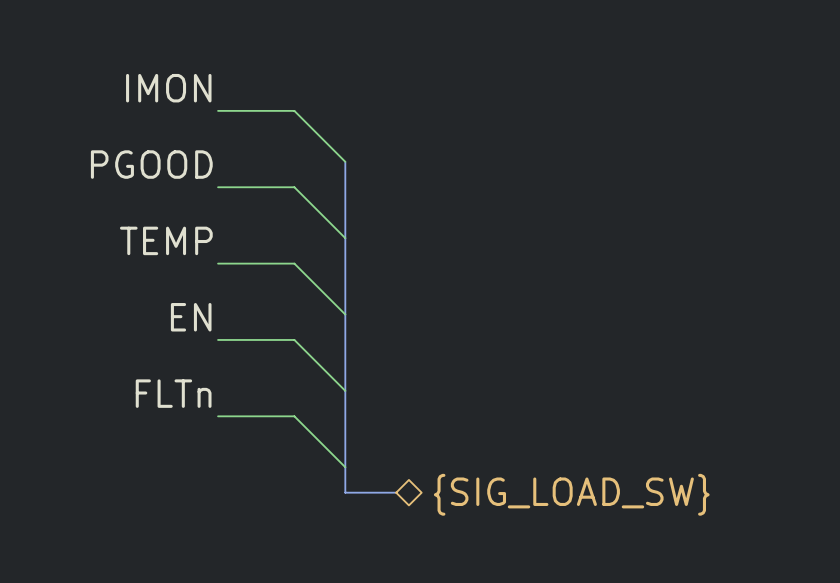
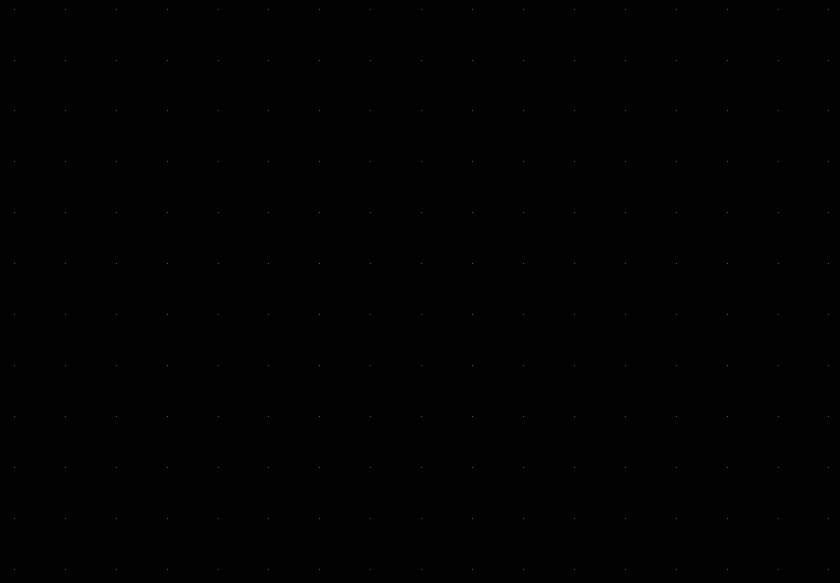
label: IMON (168, 88) -> none
wire: (218, 110) (294, 110) (345, 161) -> none
bus: (345, 161) (345, 492) (396, 492) -> none
label: PGOOD (151, 164) -> none
wire: (218, 187) (294, 187) (345, 238) -> none
label: TEMP (166, 240) -> none
wire: (218, 263) (294, 263) (345, 314) -> none
label: EN (191, 317) -> none
wire: (218, 339) (294, 339) (345, 390) -> none
label: FLTn (173, 393) -> none
wire: (218, 416) (294, 416) (345, 467) -> none
hierarchical label: {SIG_LOAD_SW} (571, 494) -> none

